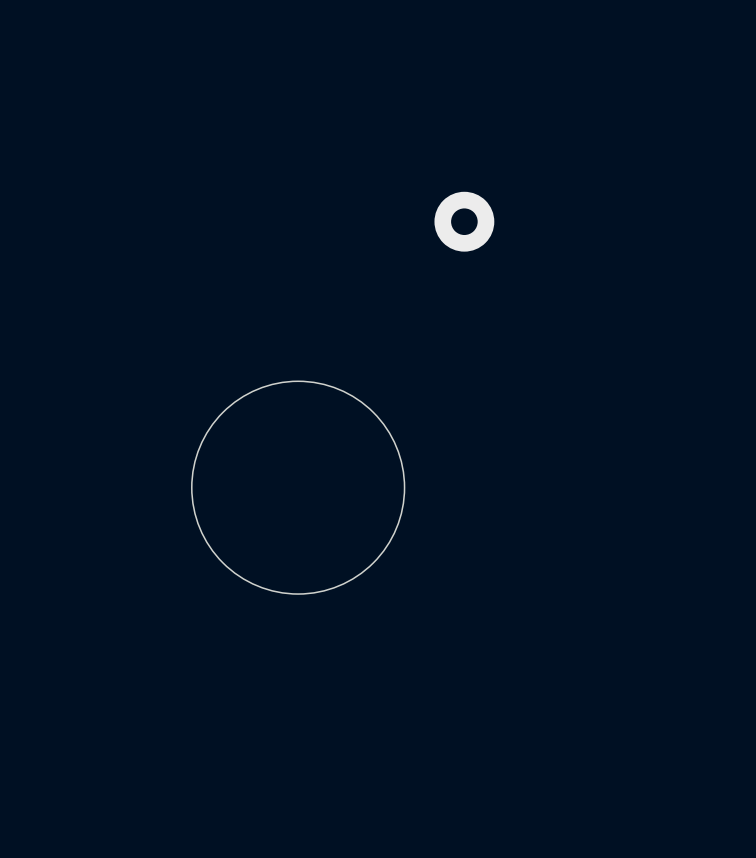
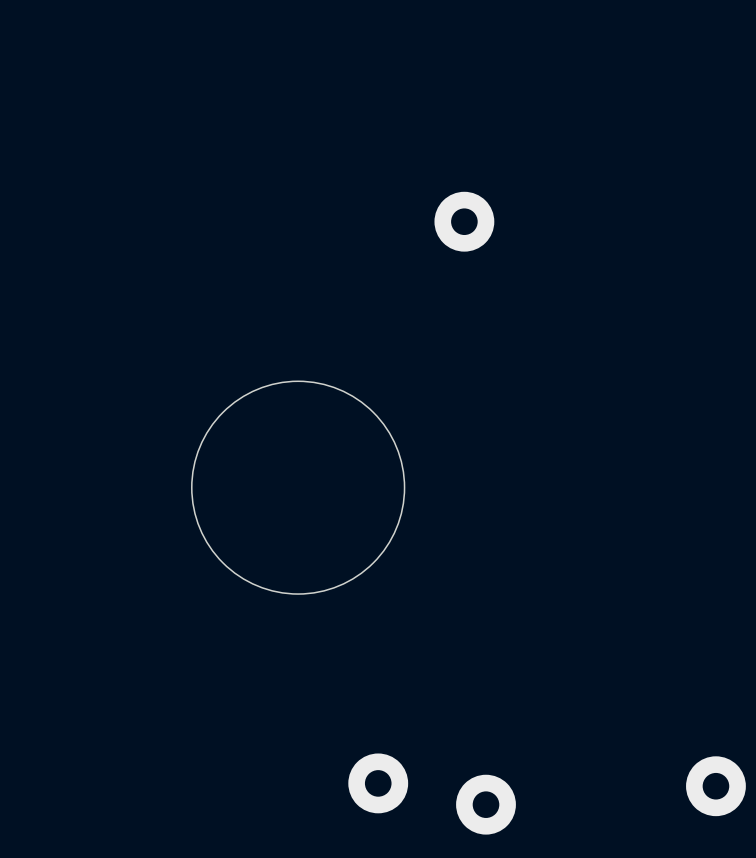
via: none -> (378, 783)
via: none -> (715, 786)
via: none -> (486, 804)

